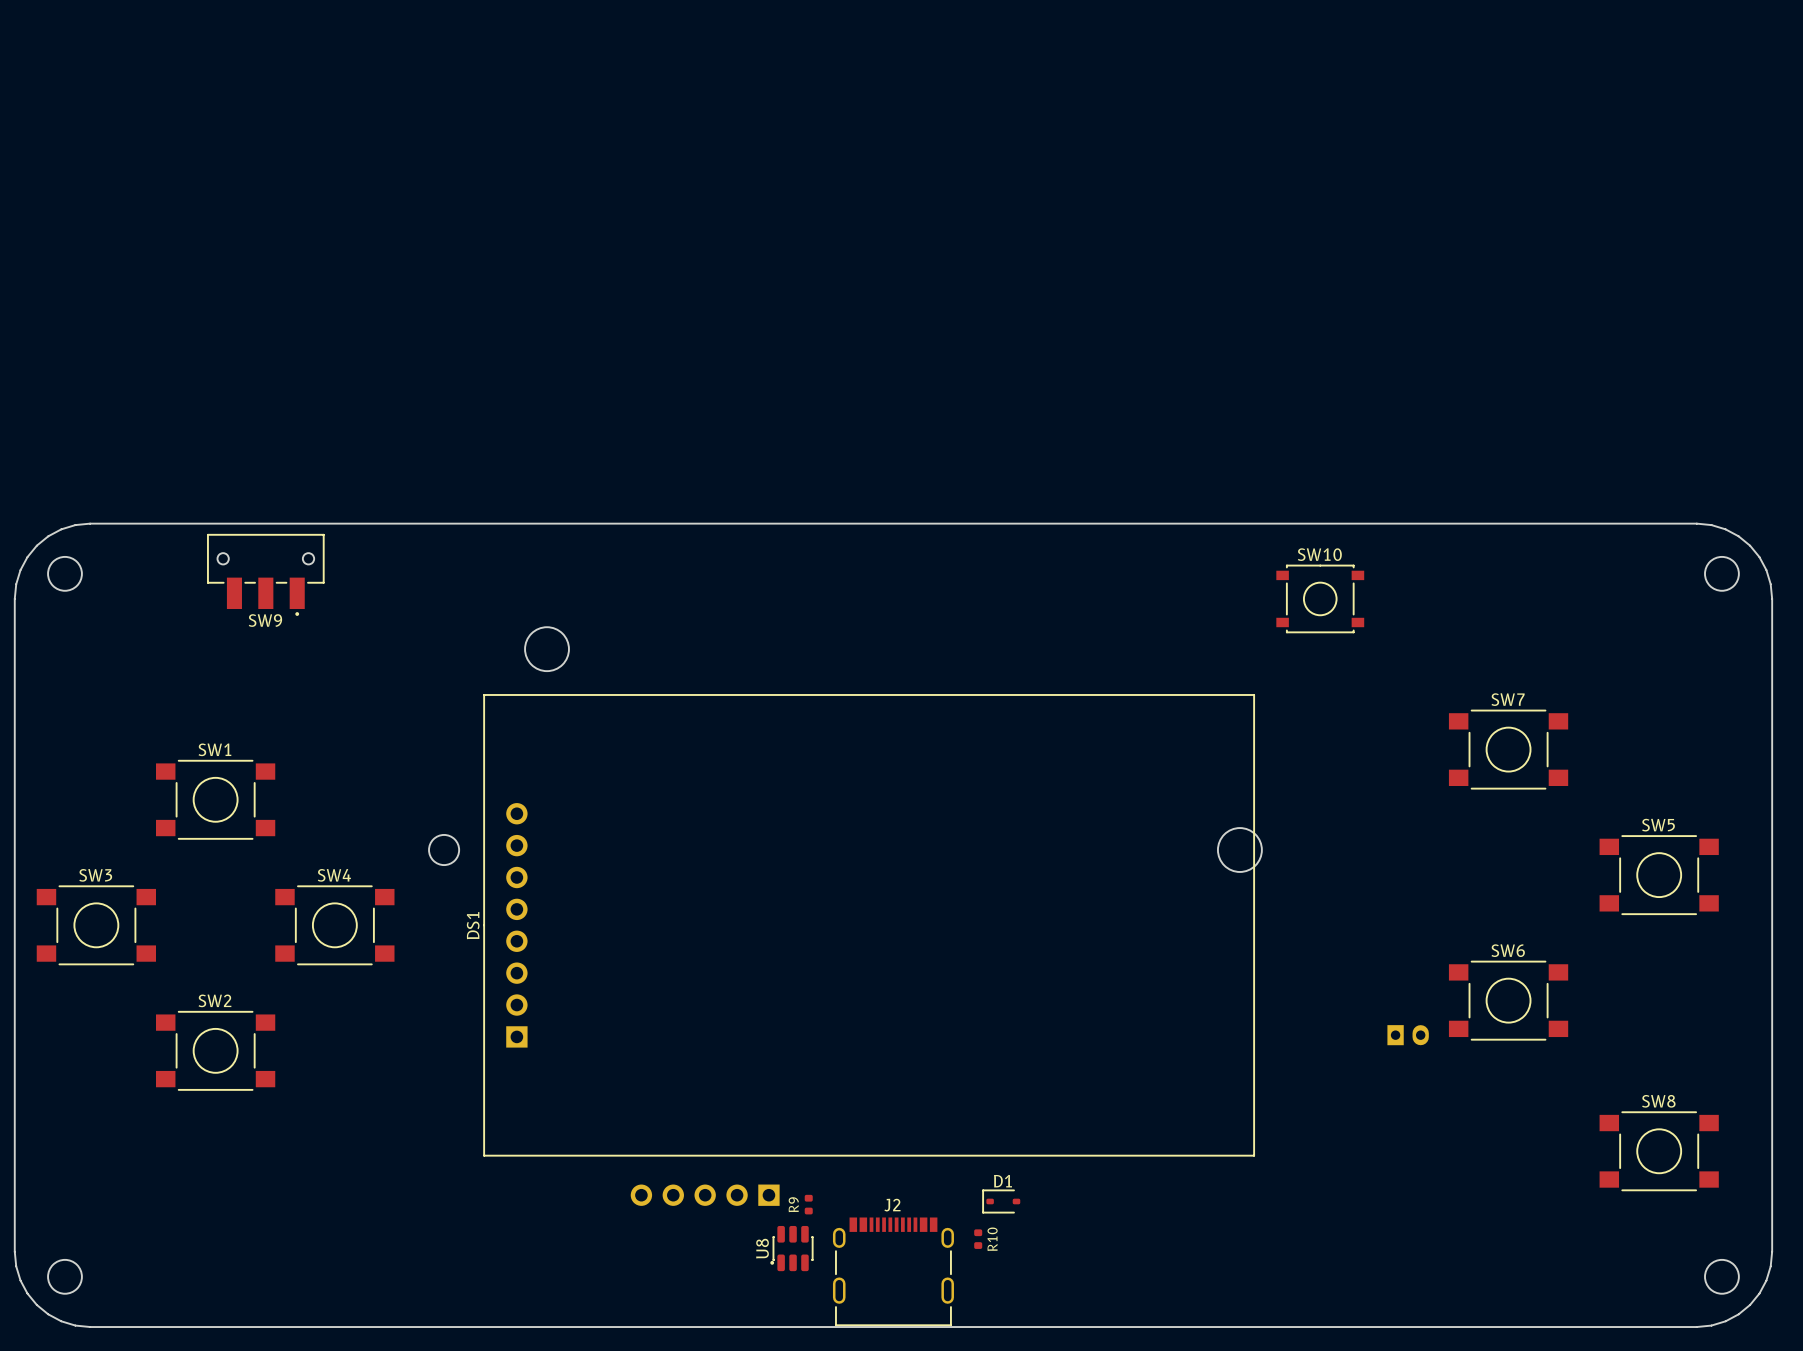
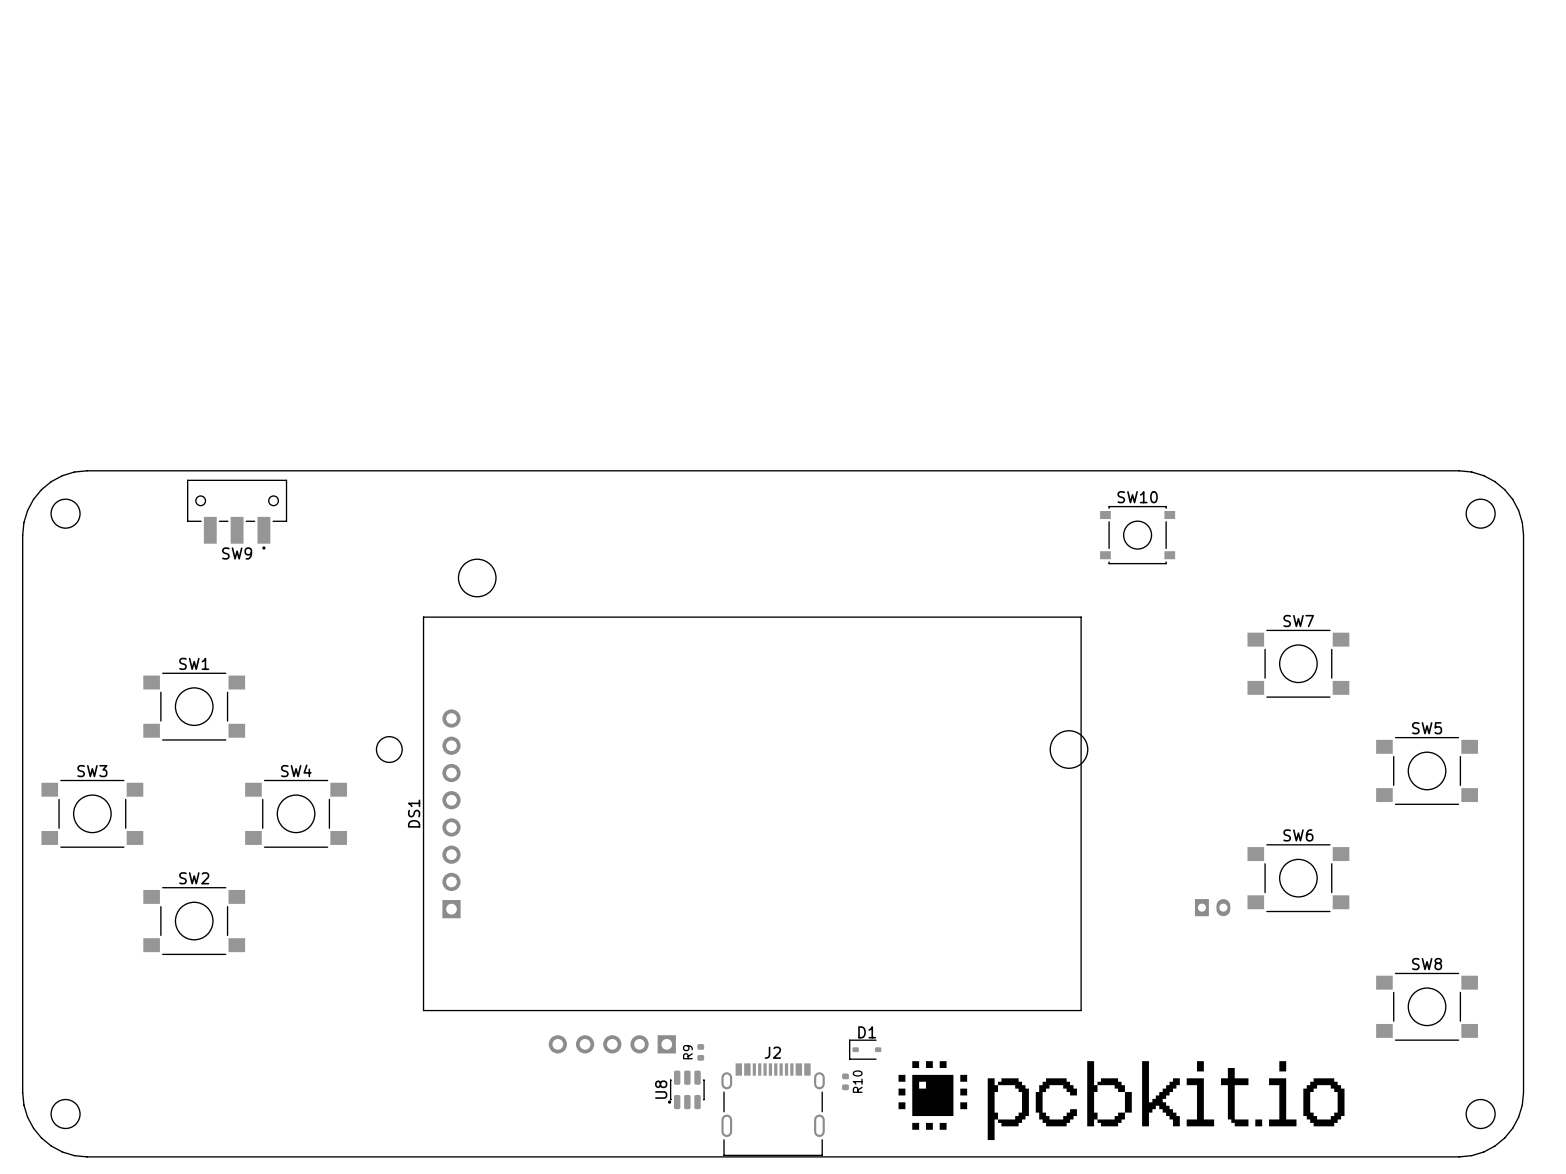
drawing: none -> [898, 1061, 1345, 1141]

